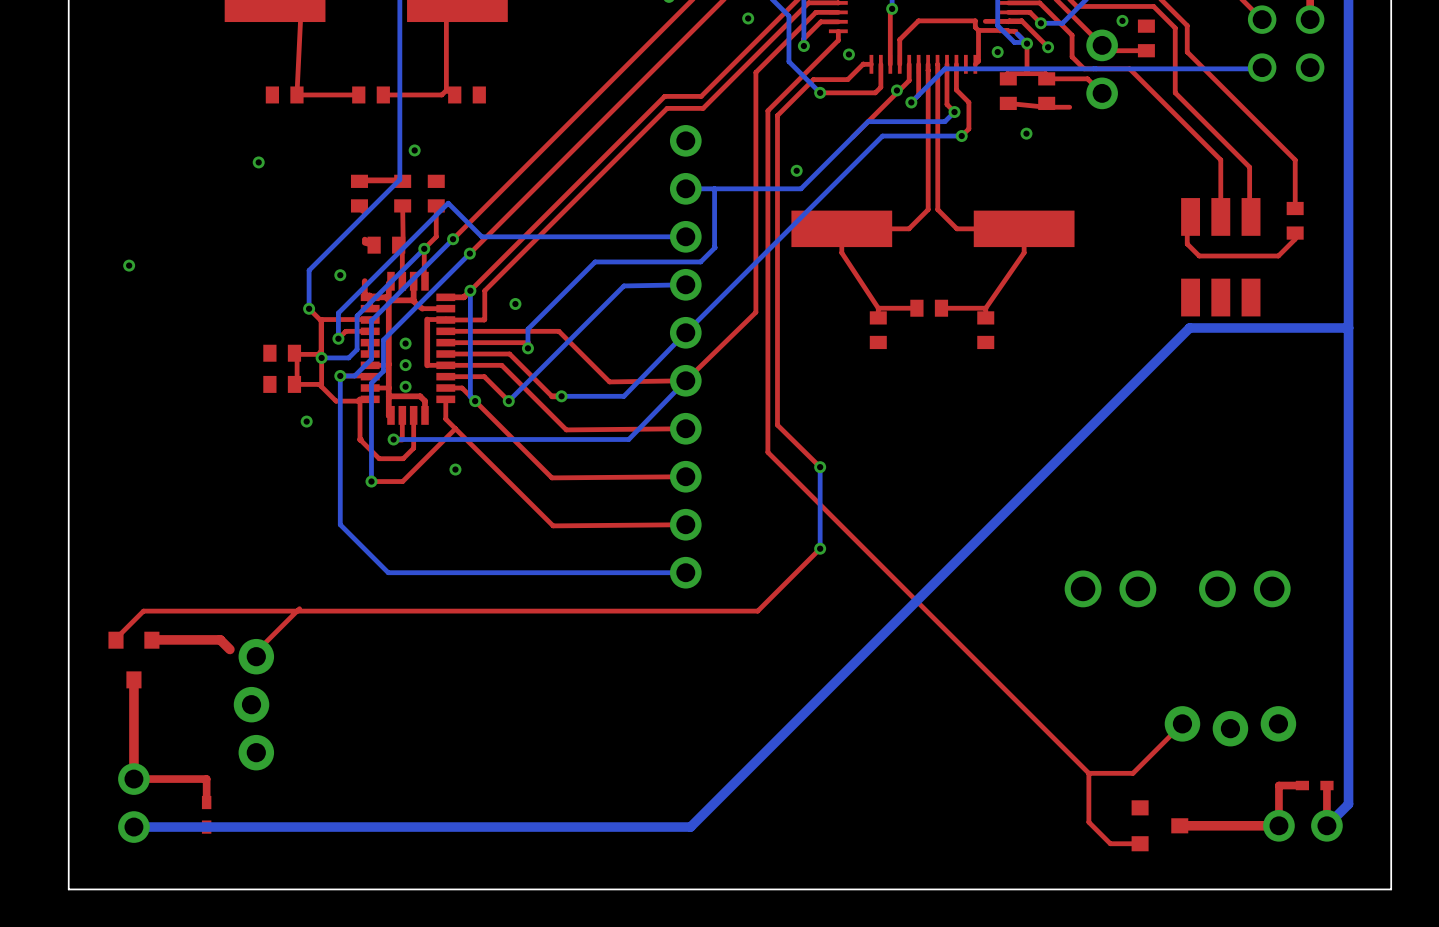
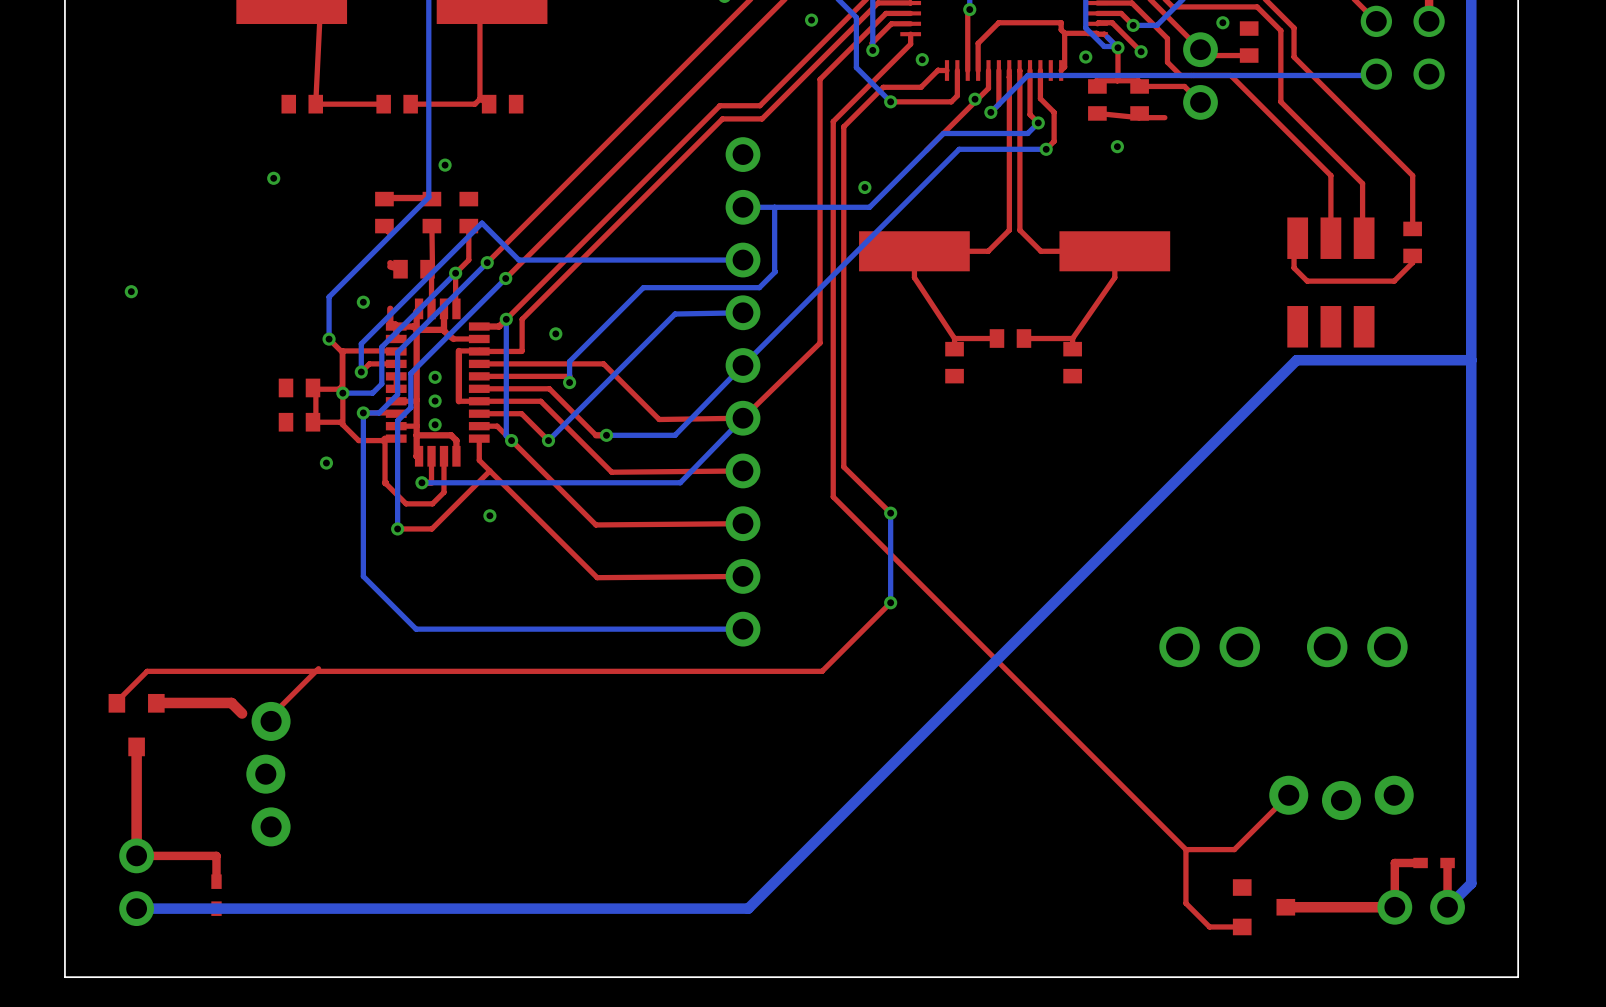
top track: (1021, 20) (985, 21) -> none

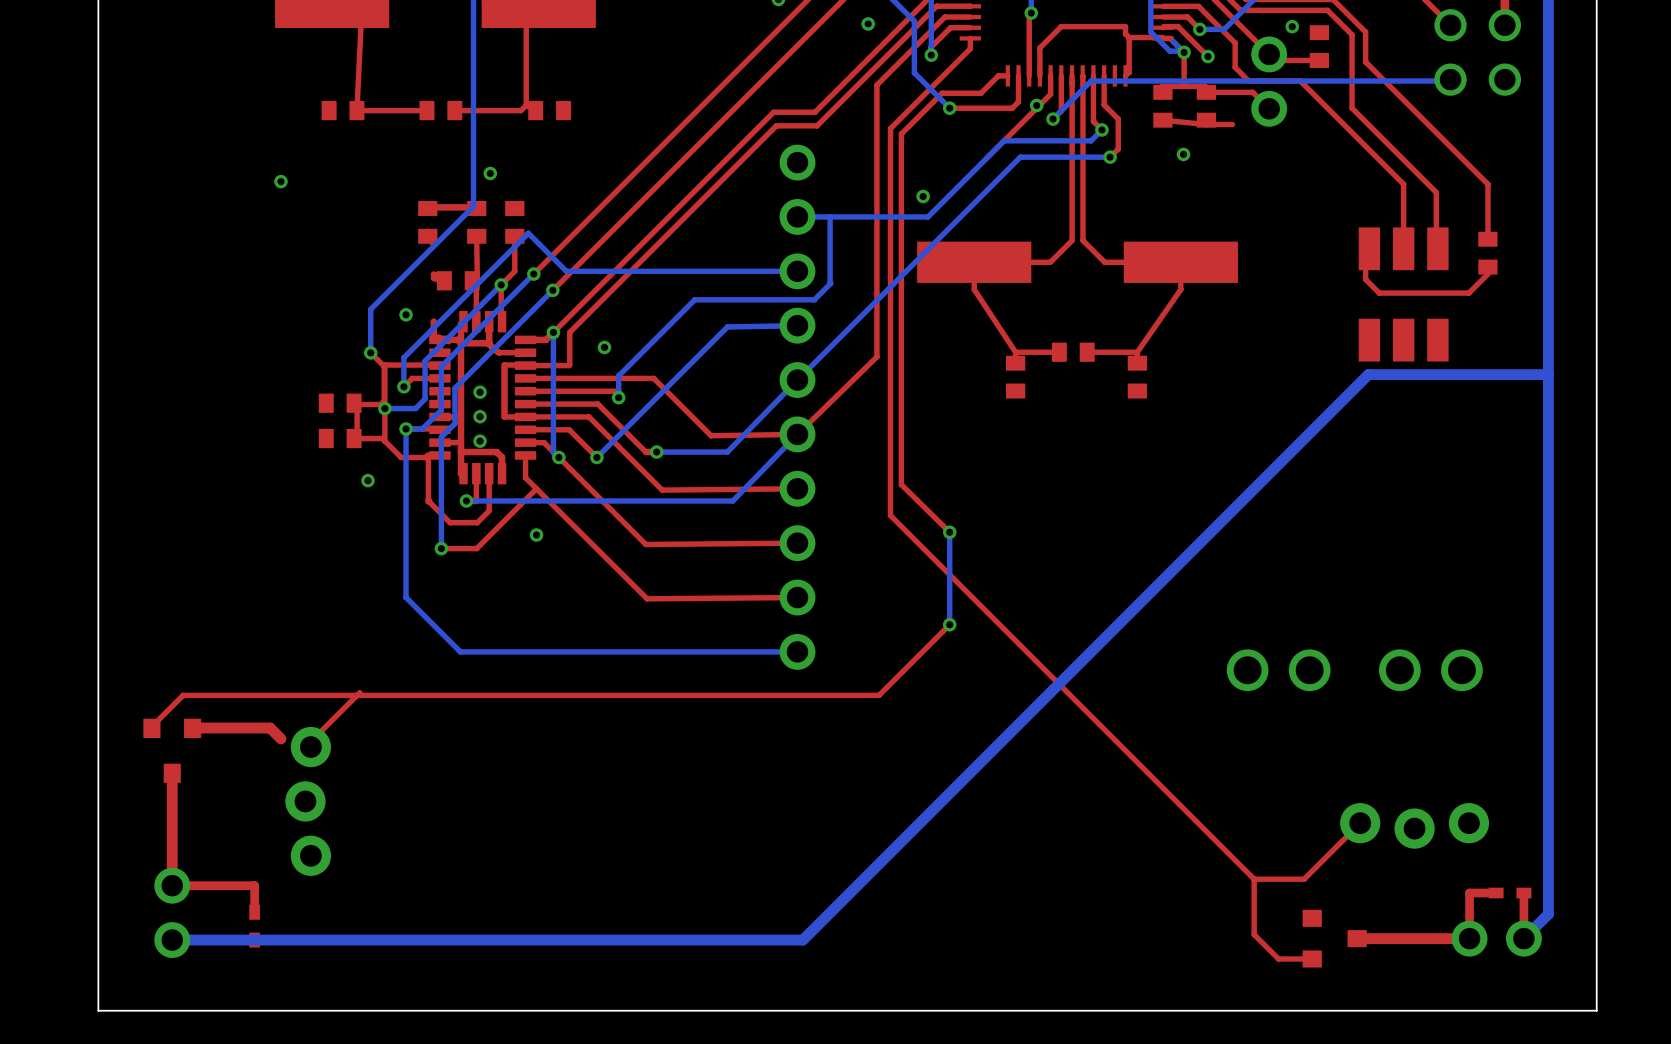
via: (1085, 57) -> none
via: (922, 59) -> none
via position: (273, 178) -> (280, 181)
via: (131, 291) -> none

